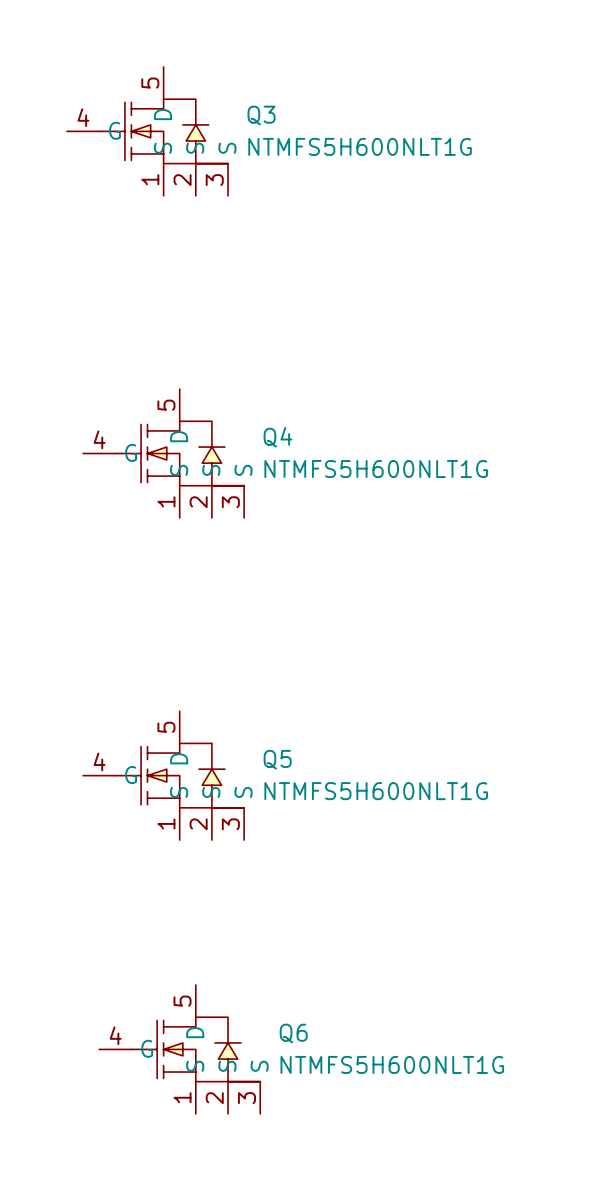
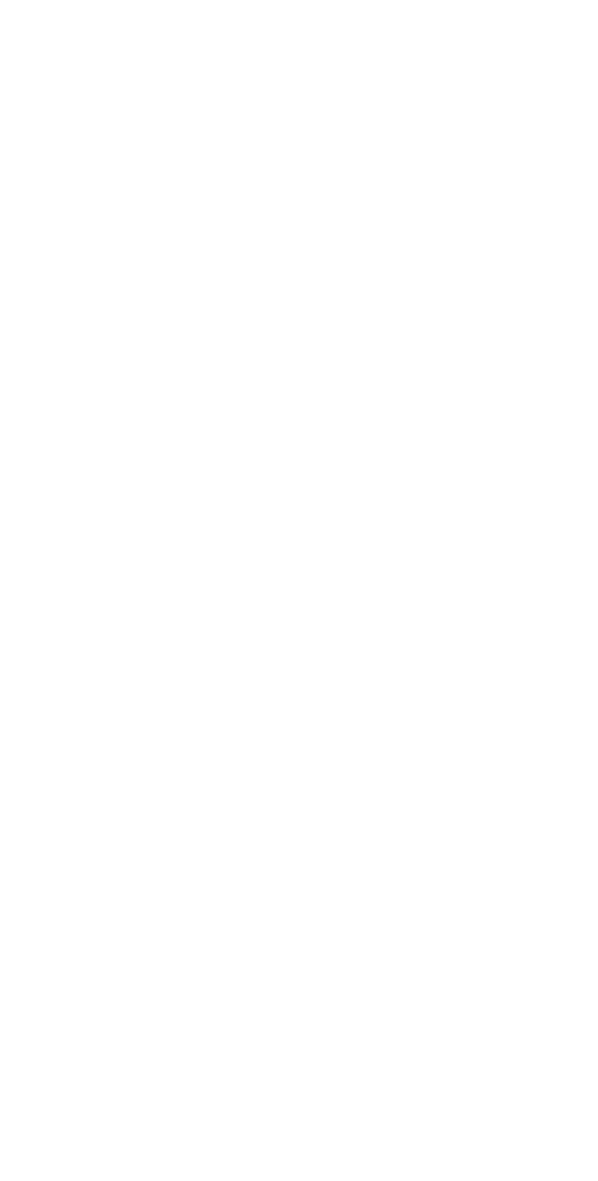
Q3: NTMFS5H600NLT1G (147, 131) -> none
Q4: NTMFS5H600NLT1G (163, 453) -> none
Q5: NTMFS5H600NLT1G (163, 775) -> none
Q6: NTMFS5H600NLT1G (179, 1049) -> none

